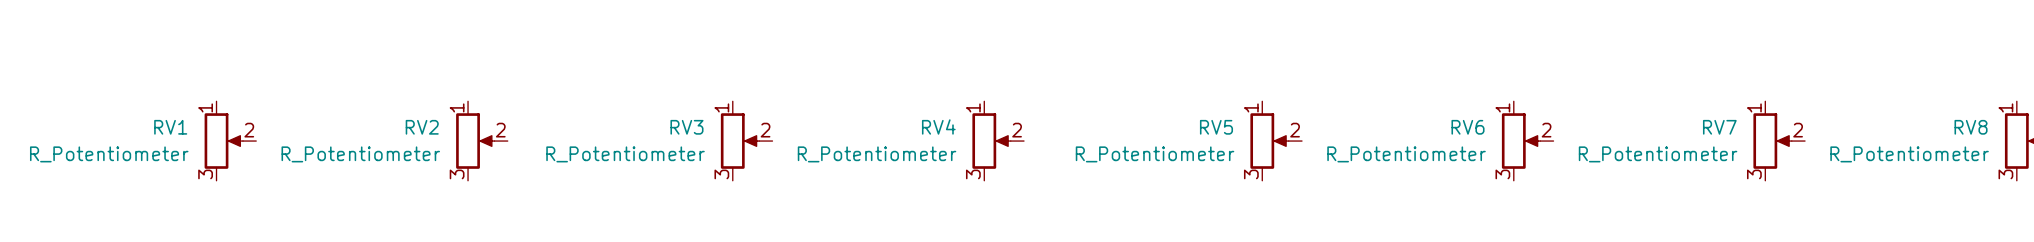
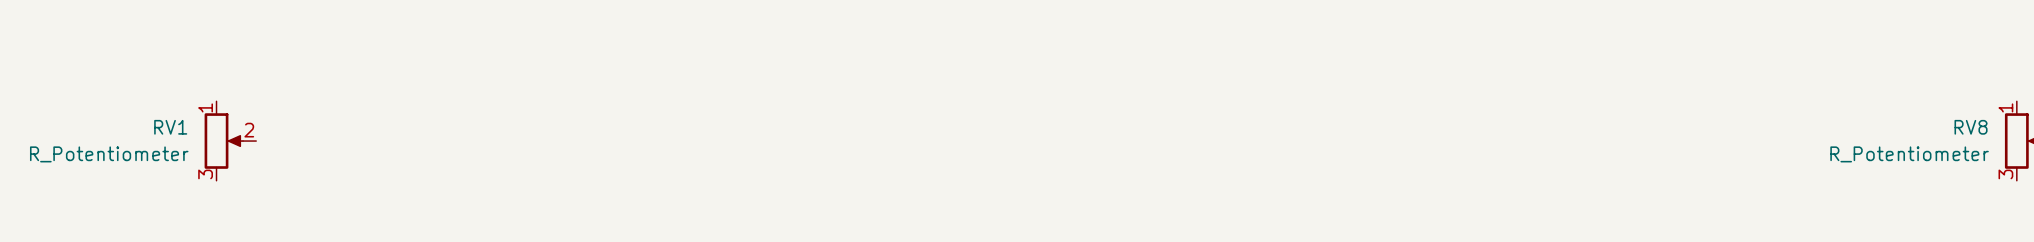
RV2: R_Potentiometer (481, 141) -> none
RV3: R_Potentiometer (746, 141) -> none
RV4: R_Potentiometer (998, 141) -> none
RV5: R_Potentiometer (1276, 141) -> none
RV6: R_Potentiometer (1527, 141) -> none
RV7: R_Potentiometer (1779, 141) -> none

